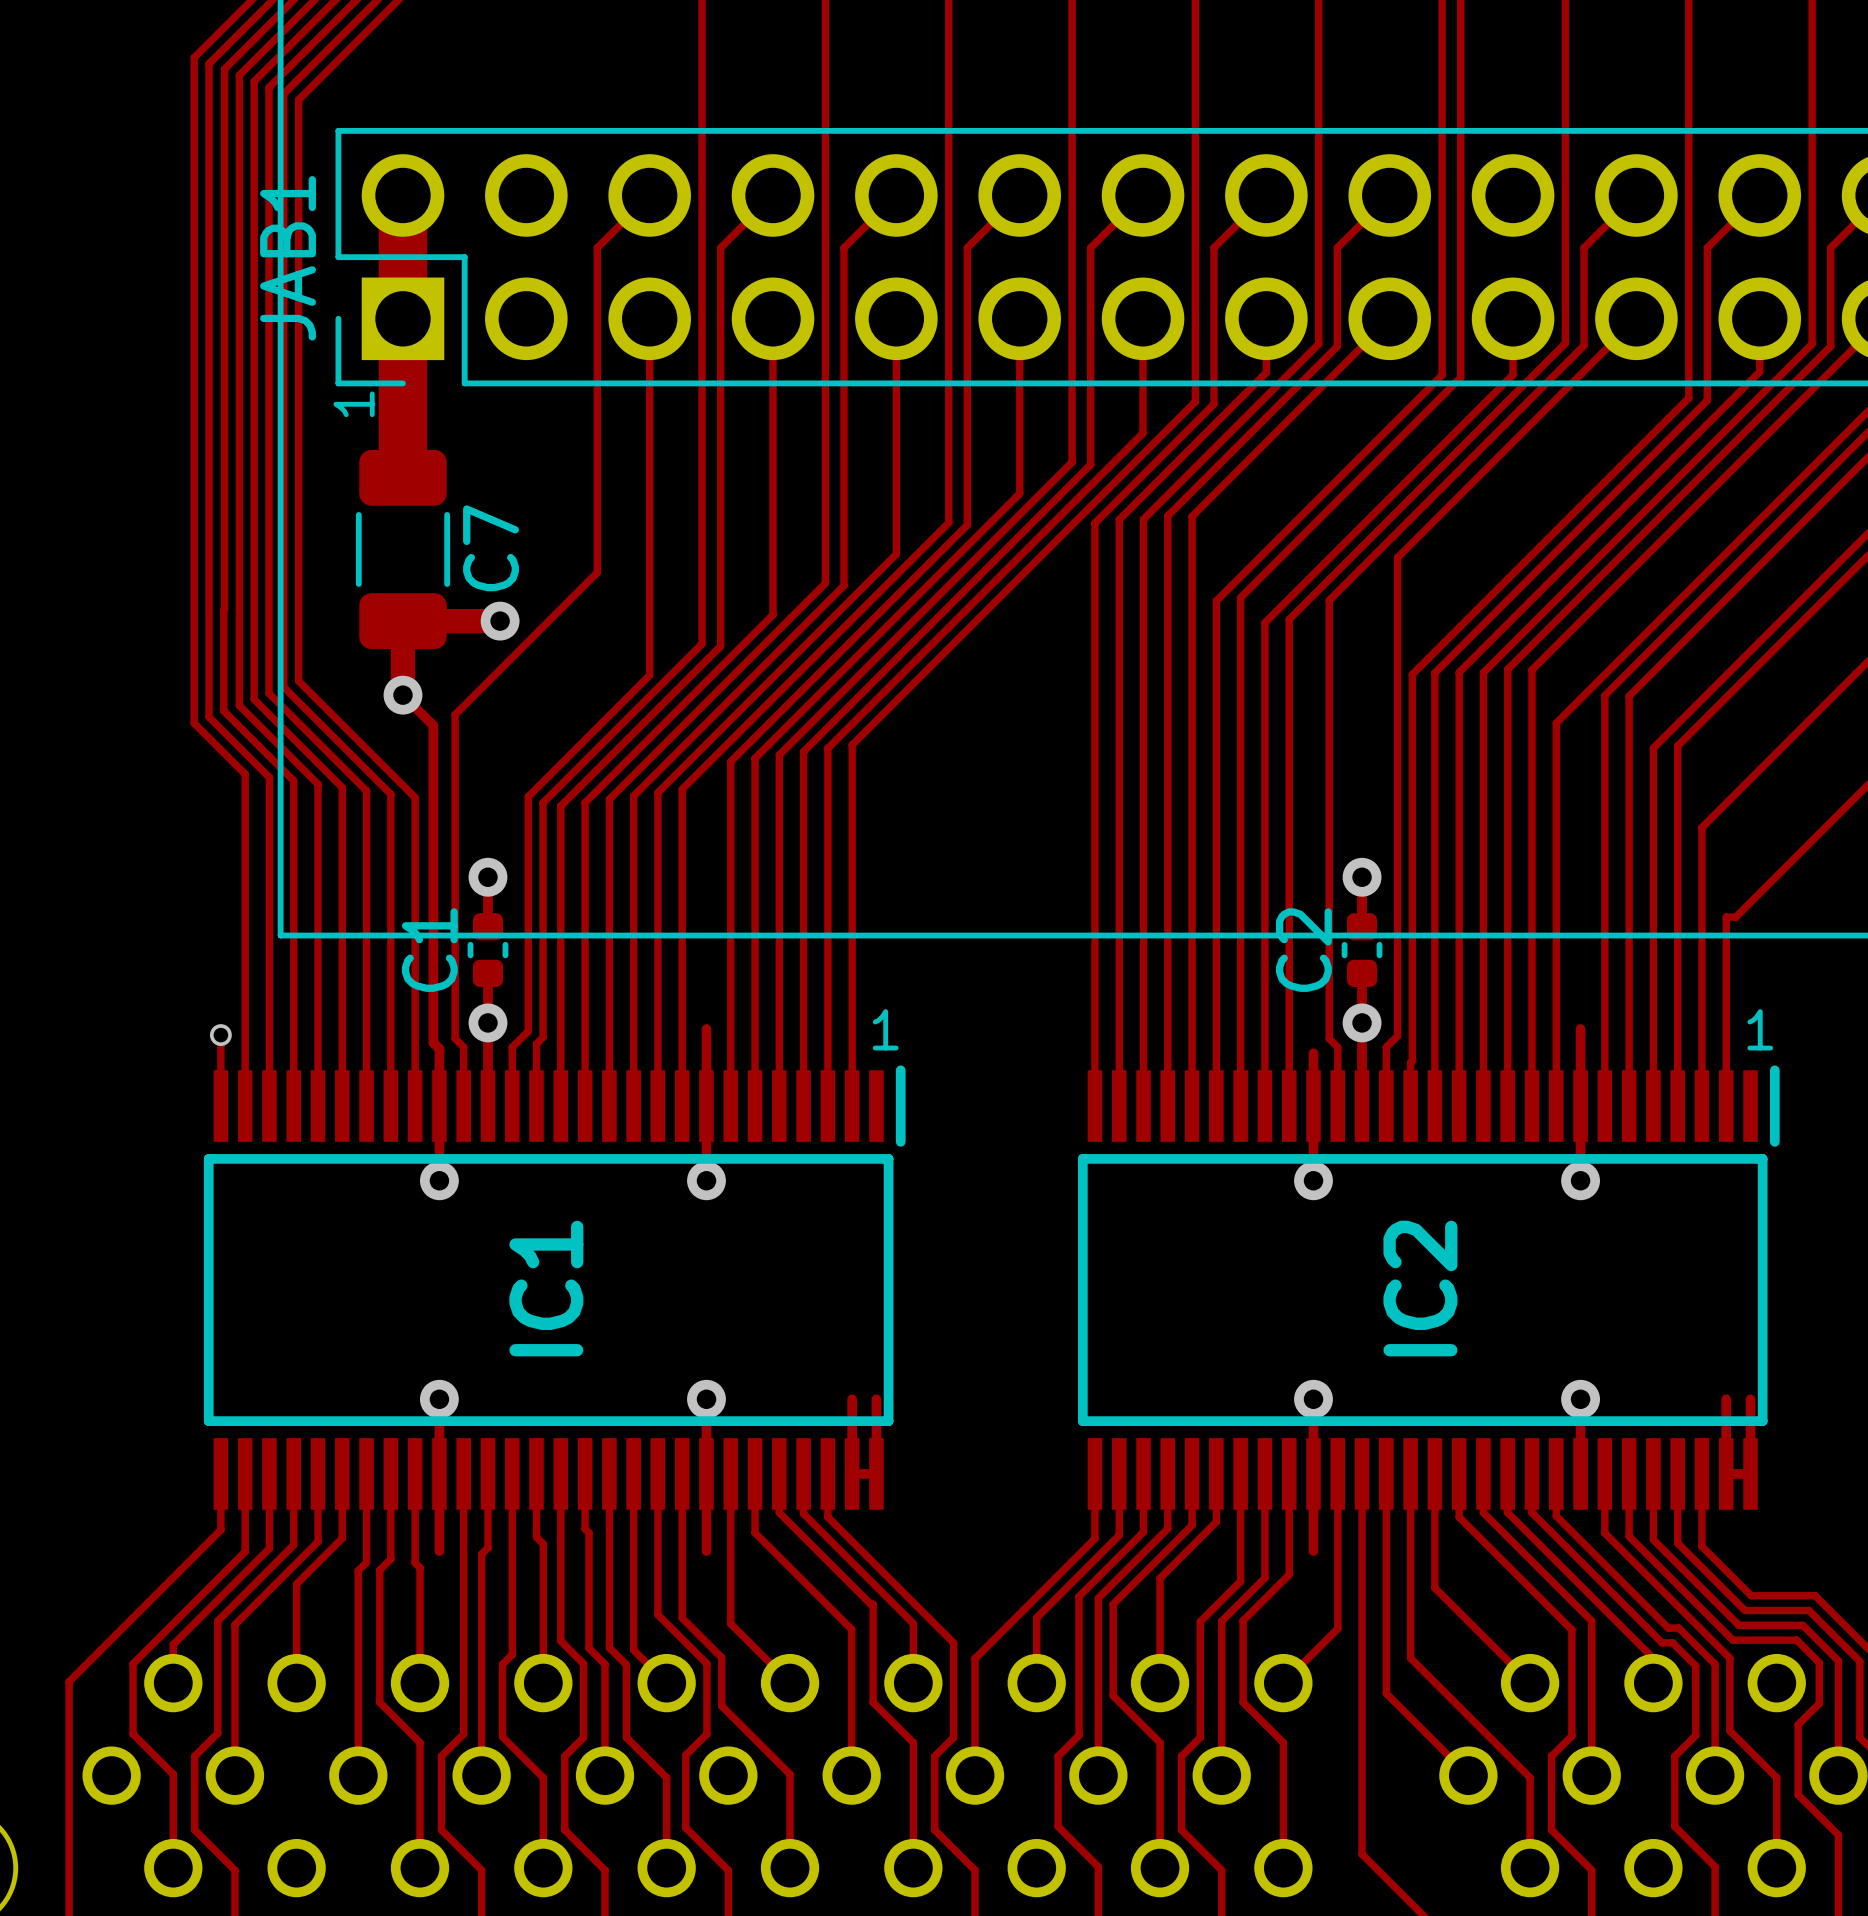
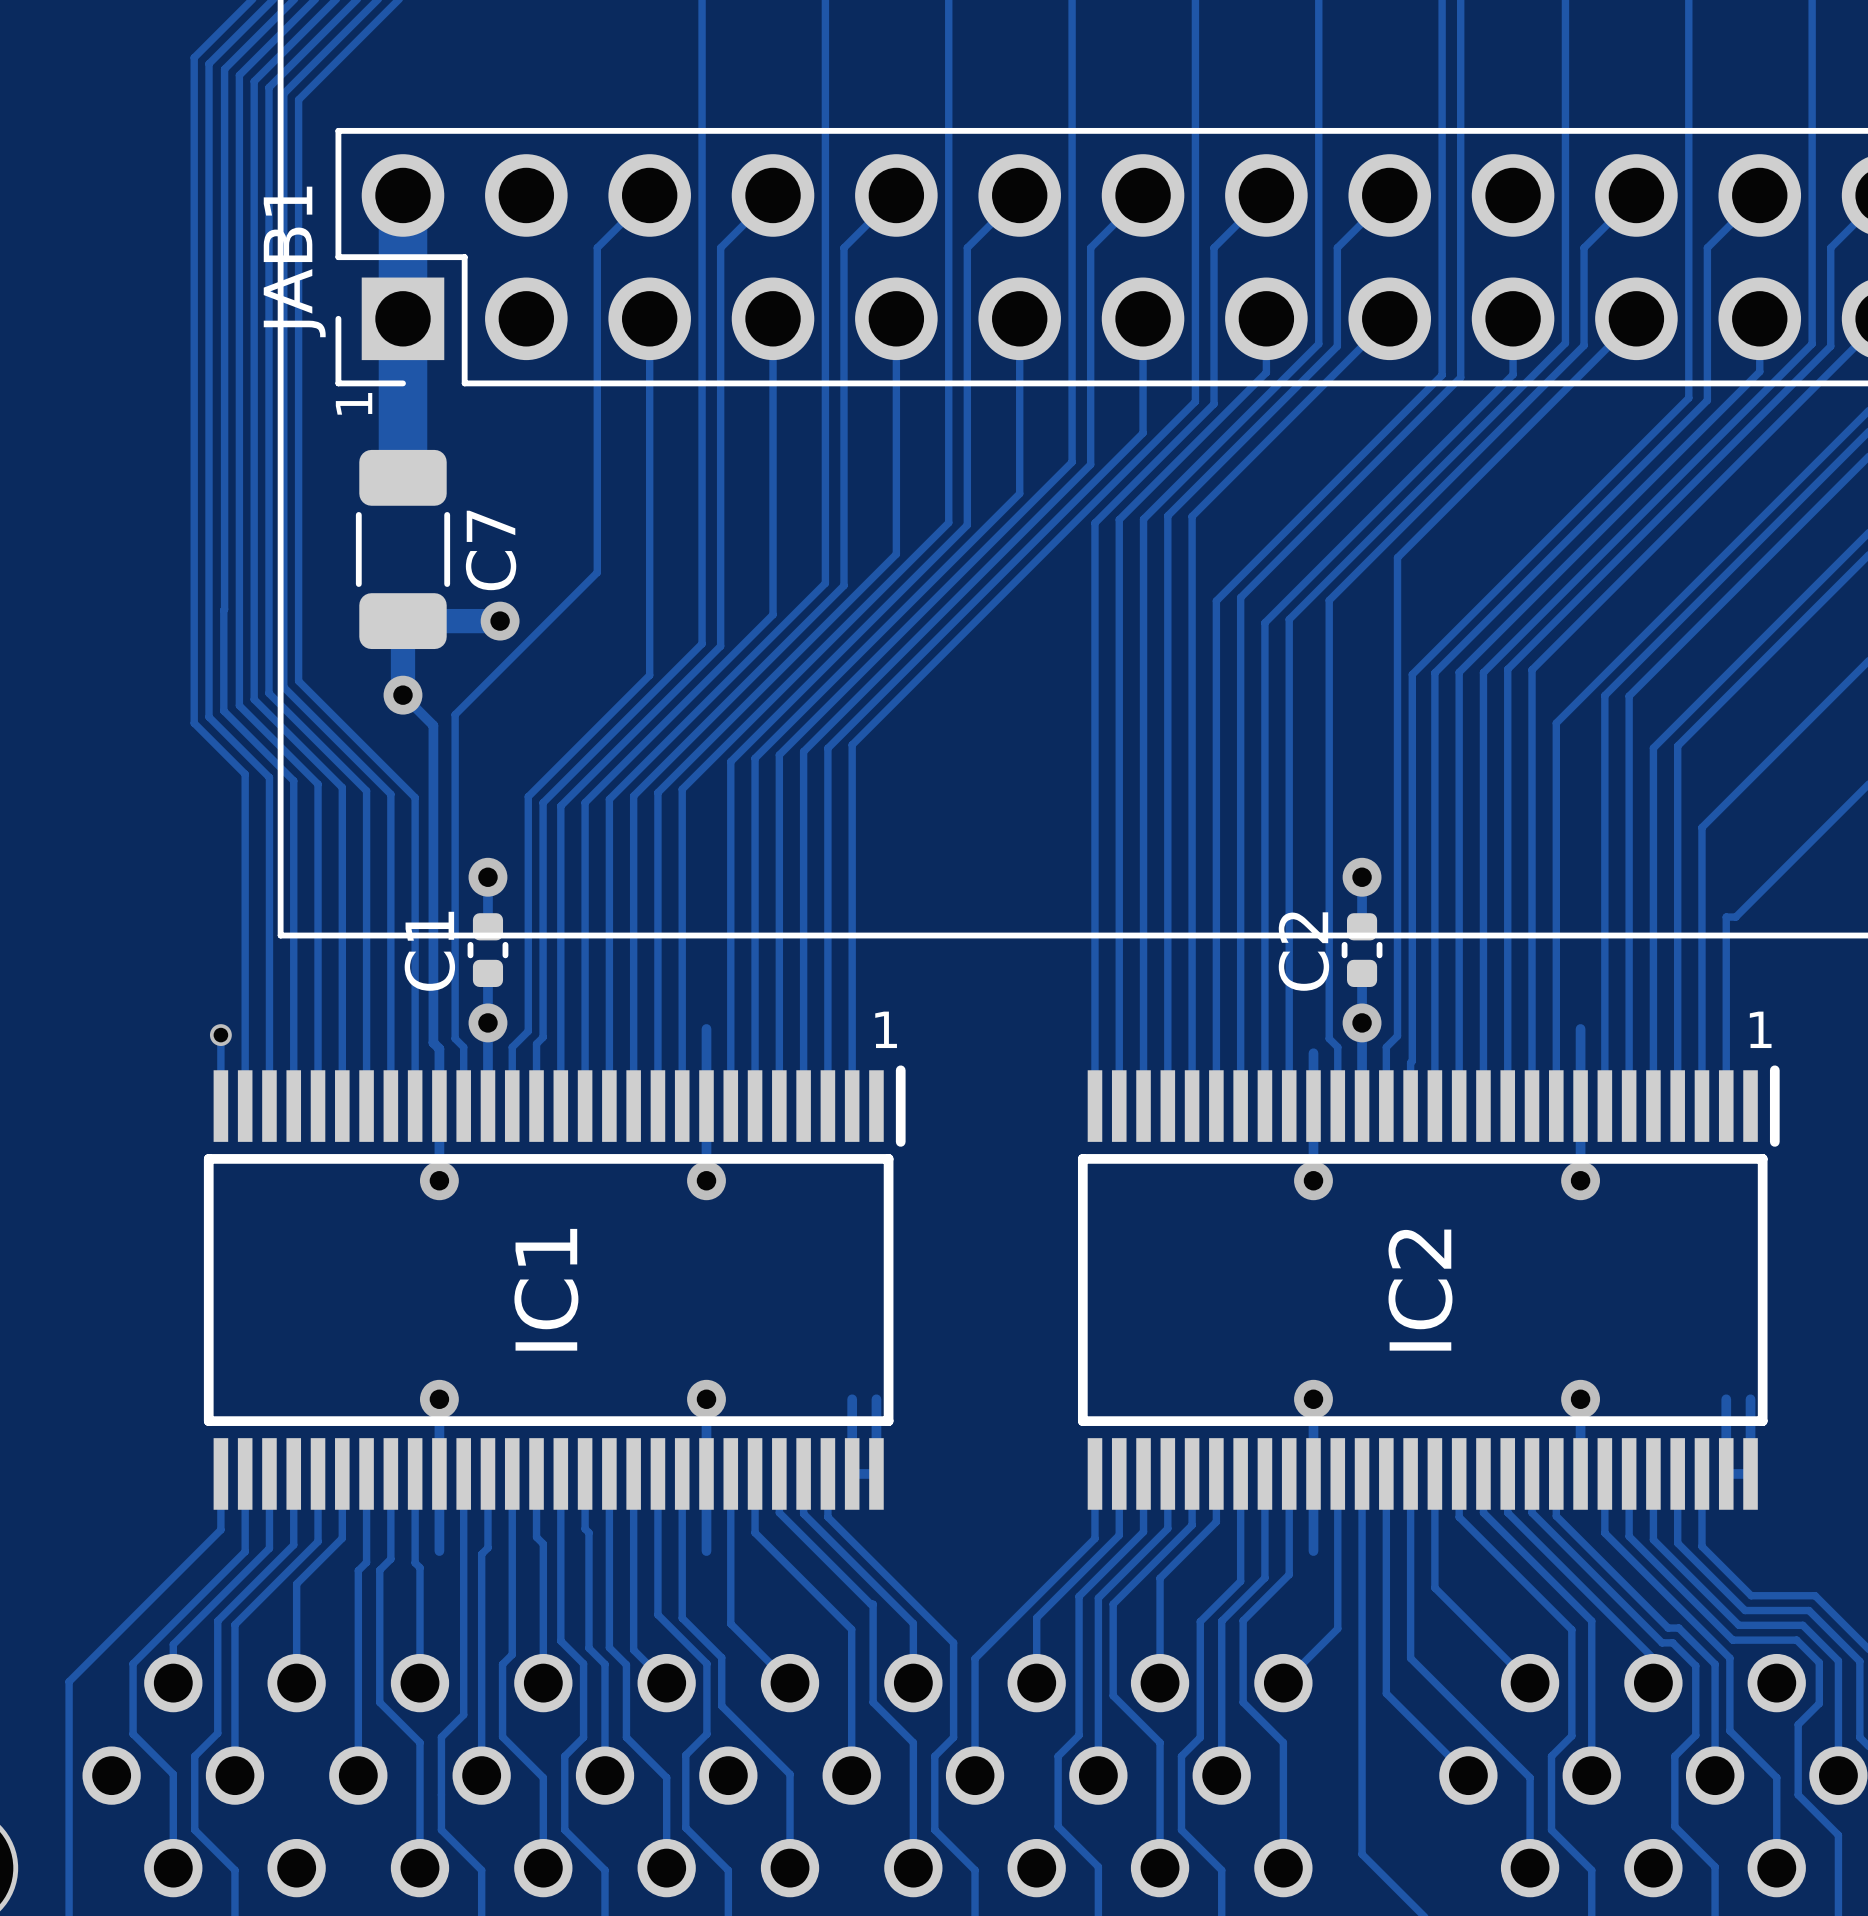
track: (463, 1714) (463, 1734) (441, 1756) -> (463, 1714) (441, 1737) (441, 1756)

